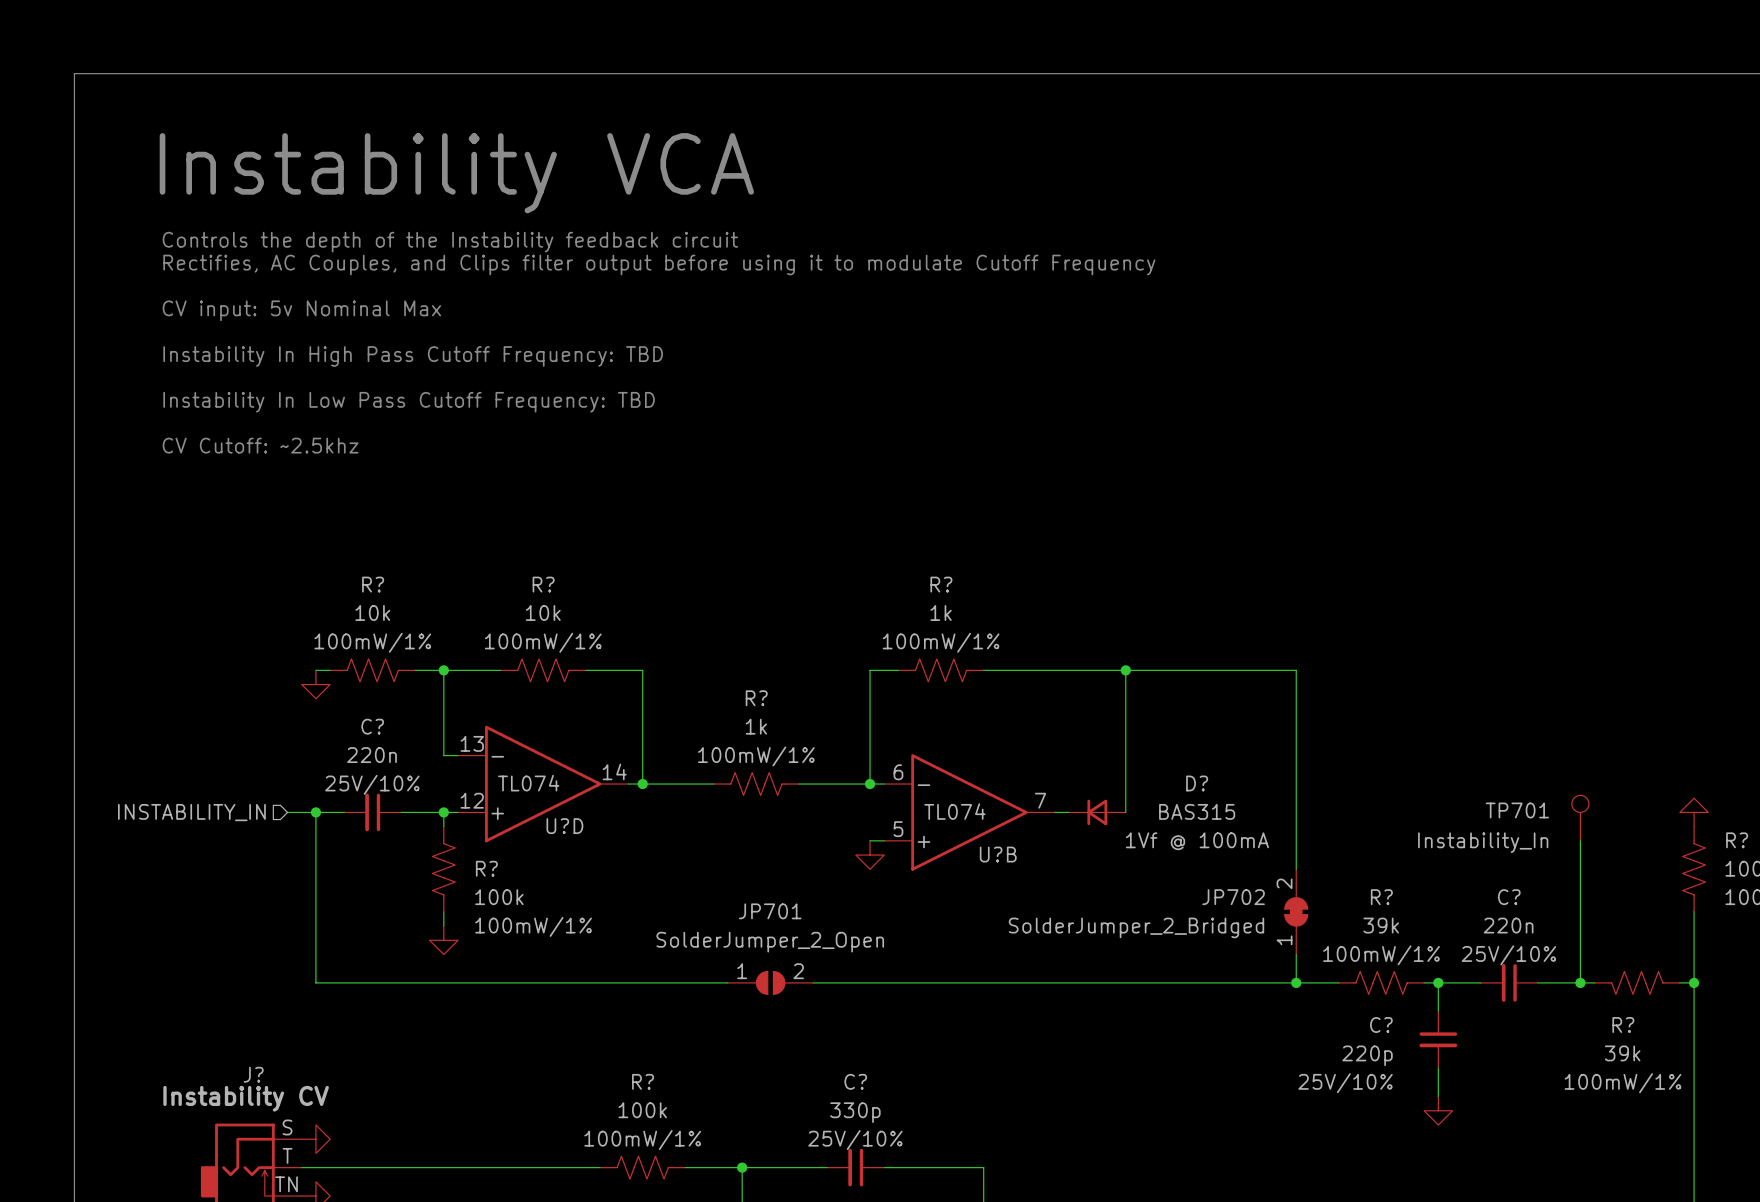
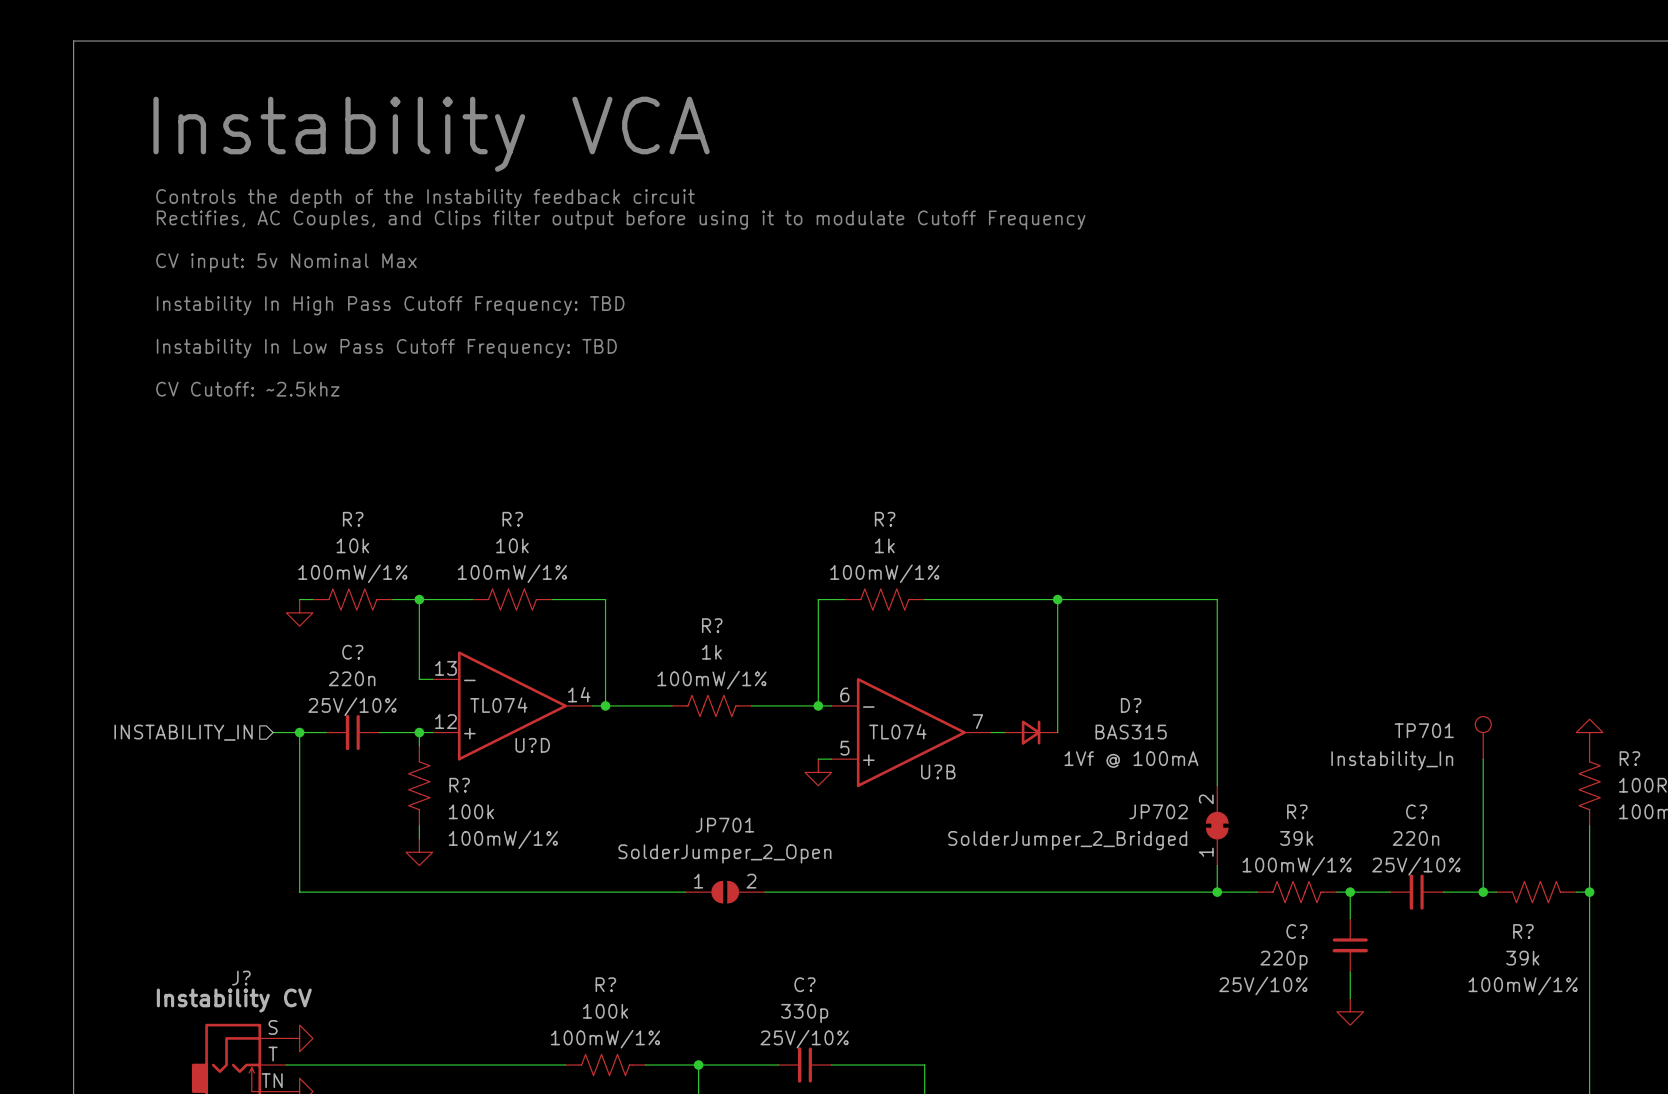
D? rotation: 0° (1097, 812) -> 180° (1031, 732)

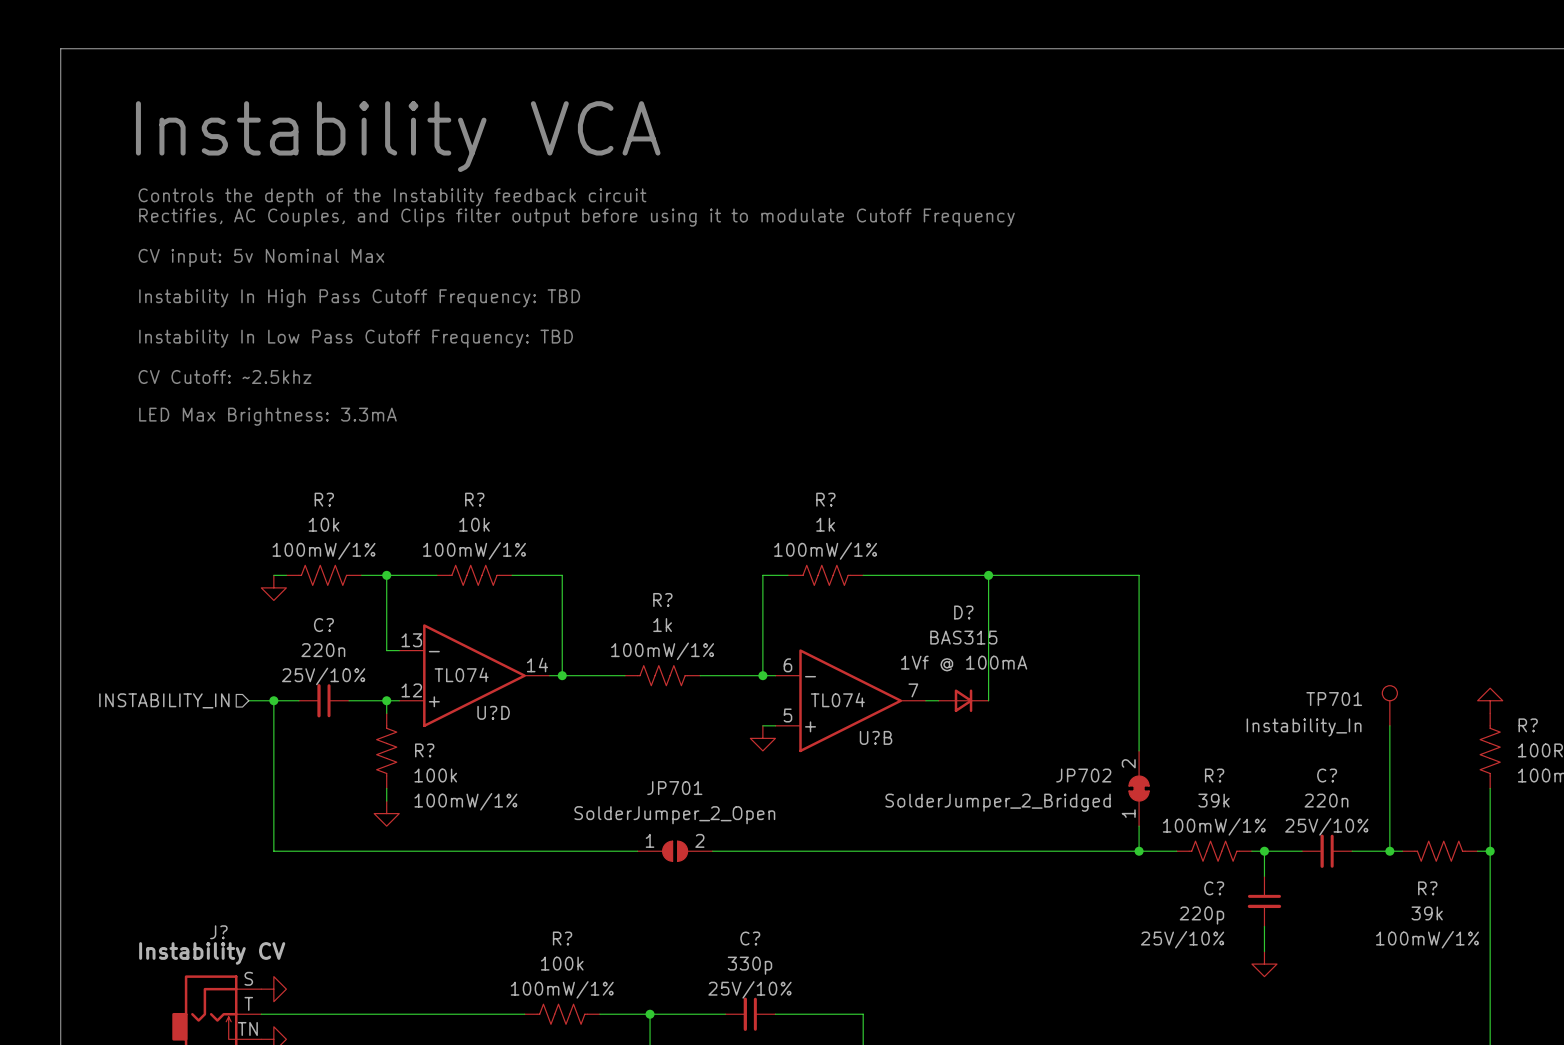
text: none -> LED Max Brightness: 3.3mA (267, 416)
D? name position: D? (1131, 705) -> D? (963, 612)
D? value position: BAS315 (1131, 732) -> BAS315 (963, 637)
D? text position: 1Vf @ 100mA (1131, 759) -> 1Vf @ 100mA (964, 663)

